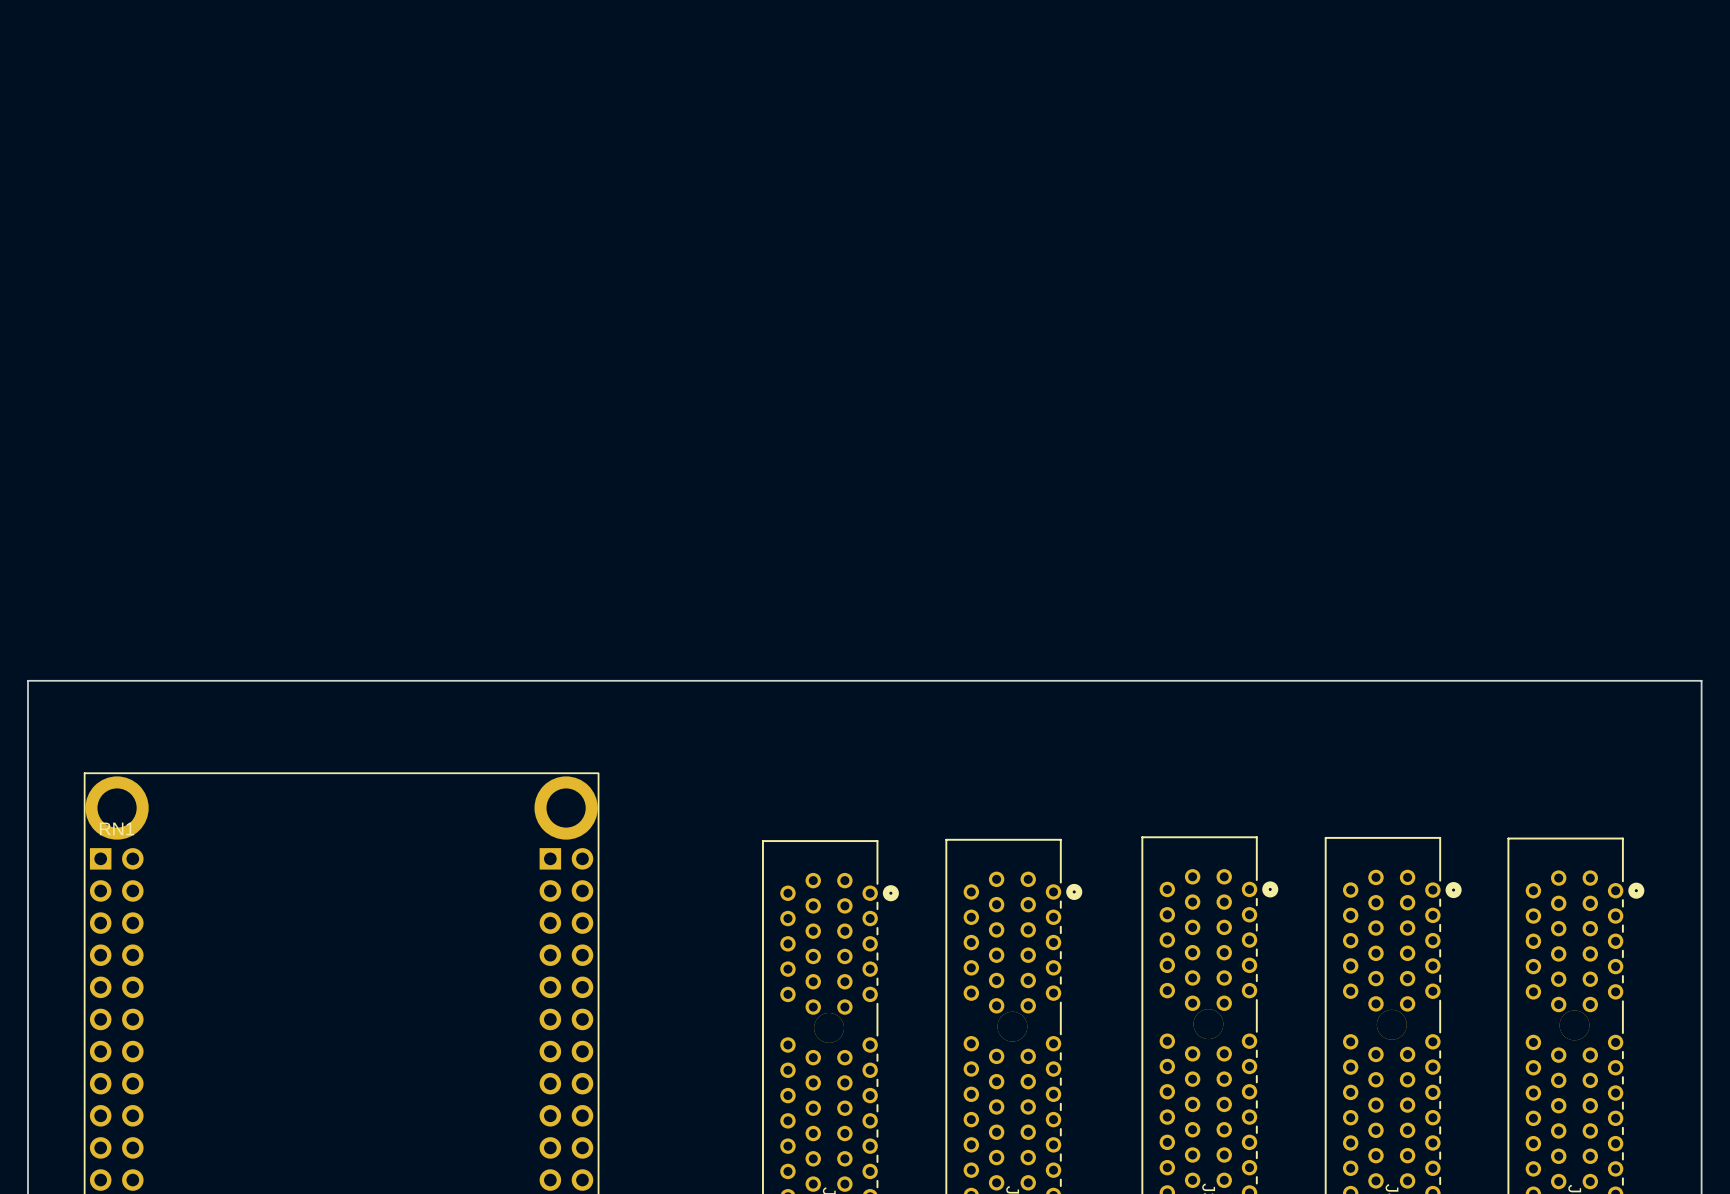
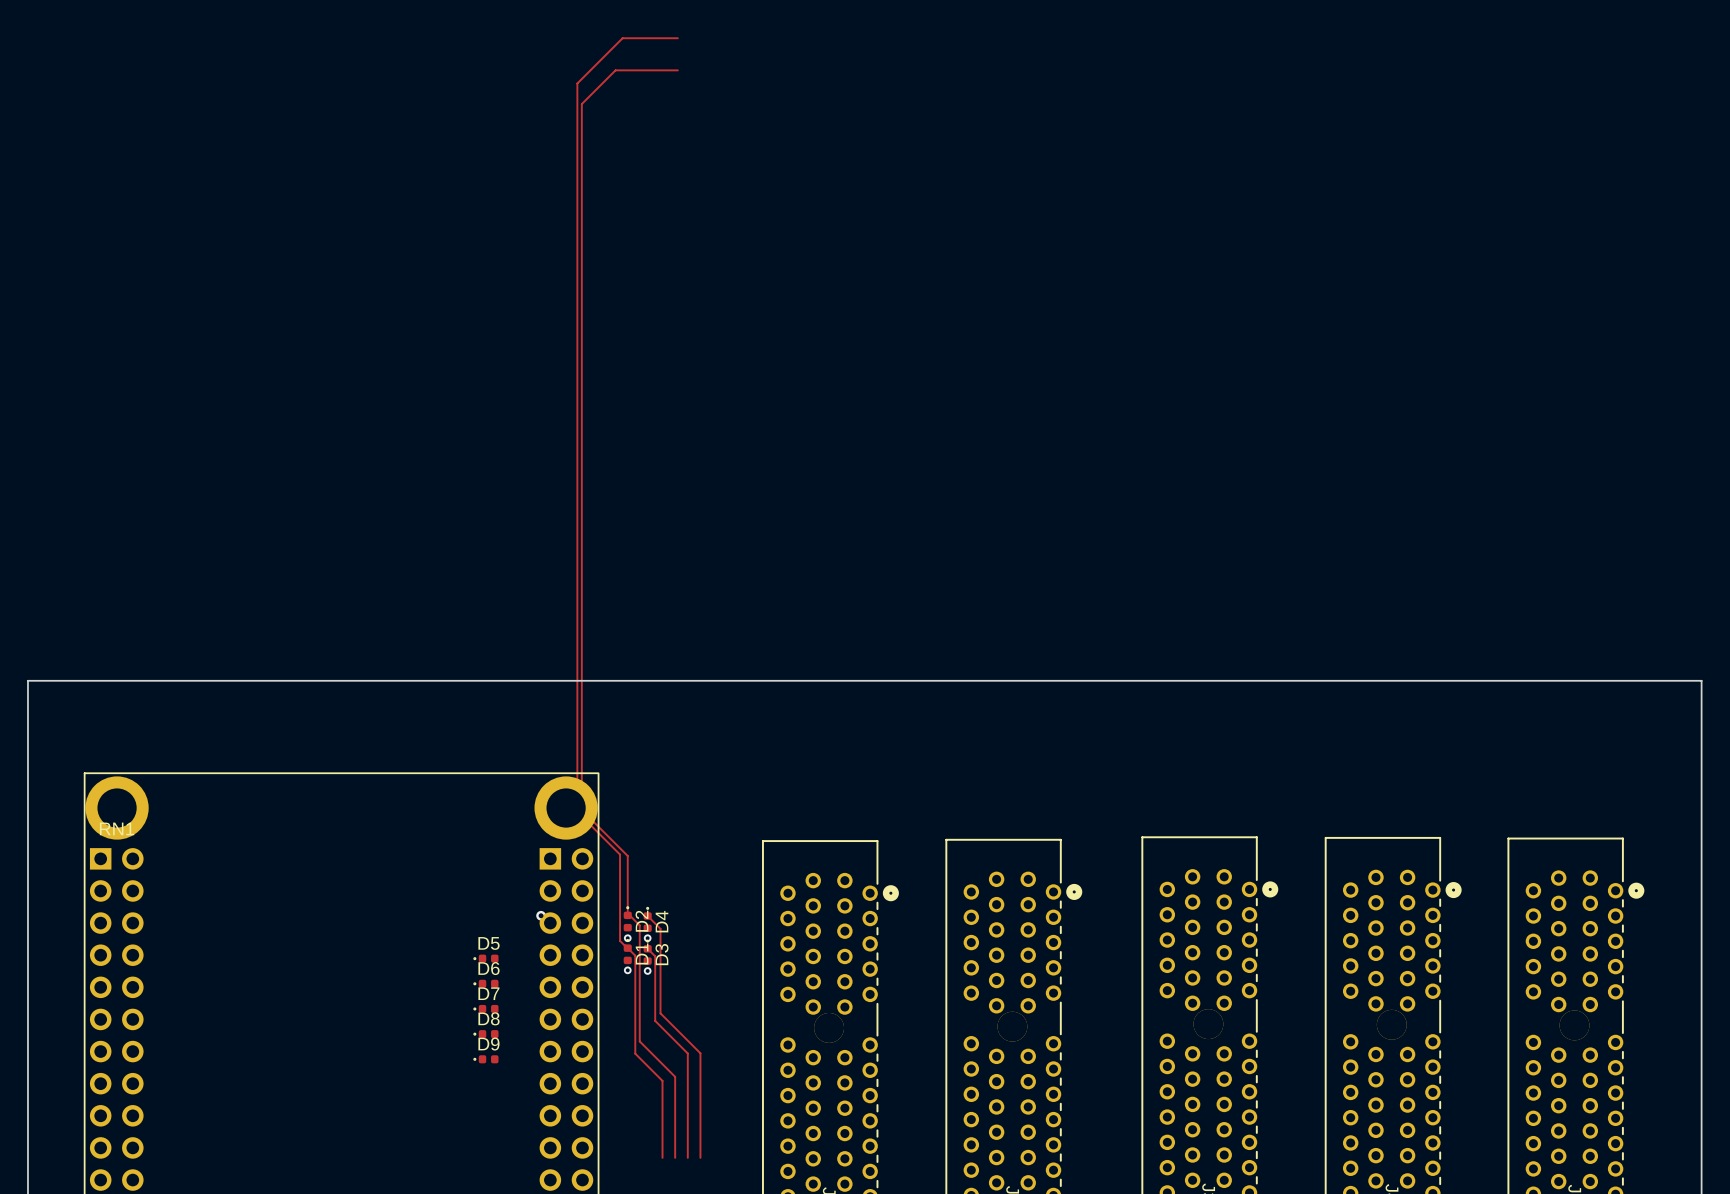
track: none -> (677, 38) (622, 38) (577, 83) (577, 811) (620, 854) (620, 940) (635, 955) (635, 1053) (662, 1080) (662, 1157)
track: none -> (677, 70) (615, 70) (581, 104) (581, 810) (627, 855) (627, 913) (639, 925) (639, 1041) (675, 1076) (675, 1157)
via: none -> (541, 915)
track: none -> (647, 916) (660, 928) (660, 1013) (700, 1053) (700, 1157)
D2: none -> (627, 918)
D4: none -> (647, 919)
via: none -> (627, 938)
via: none -> (647, 938)
track: none -> (647, 948) (655, 956) (655, 1020) (687, 1053) (687, 1157)
D1: none -> (627, 951)
D3: none -> (647, 952)
D5: none -> (486, 958)
via: none -> (627, 970)
via: none -> (647, 970)
D6: none -> (486, 983)
D7: none -> (486, 1008)
D8: none -> (486, 1034)
D9: none -> (486, 1059)

